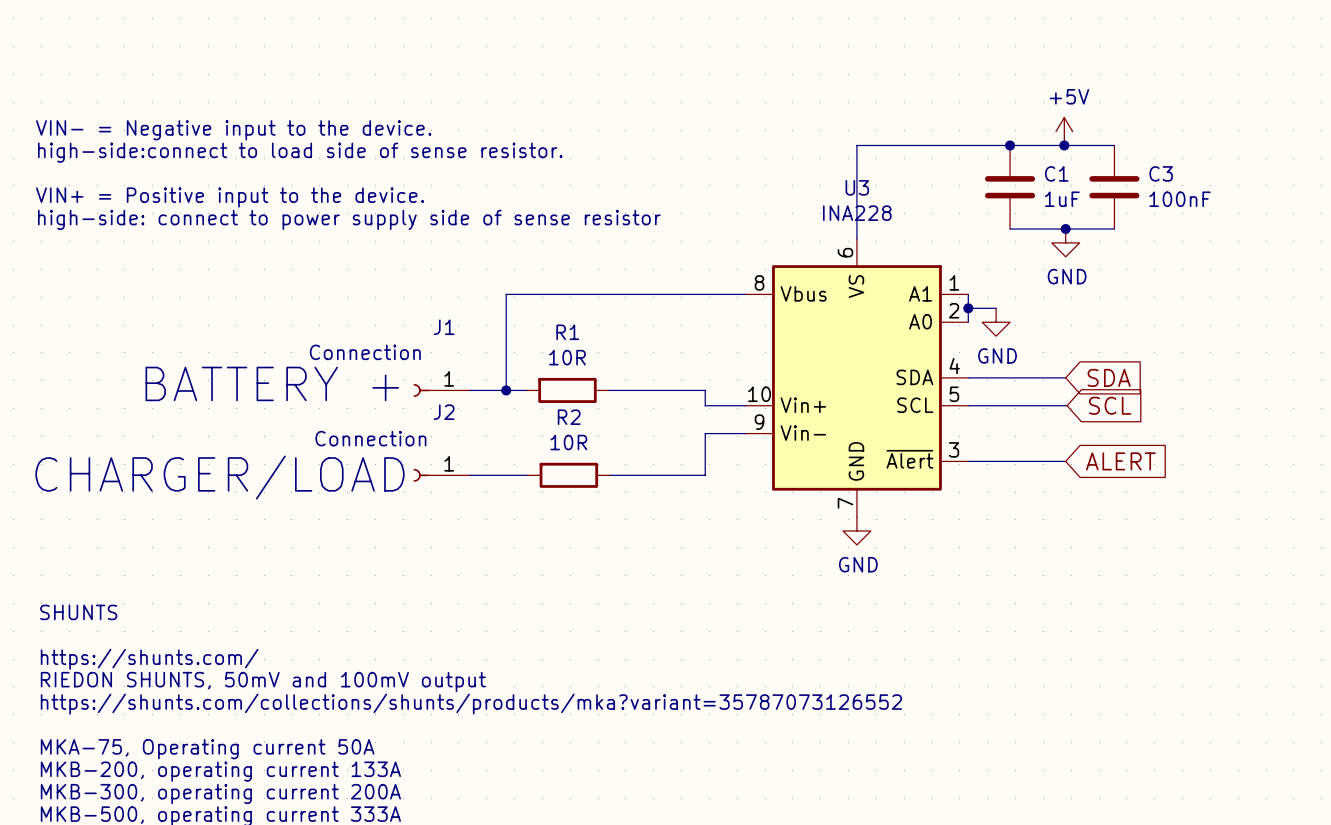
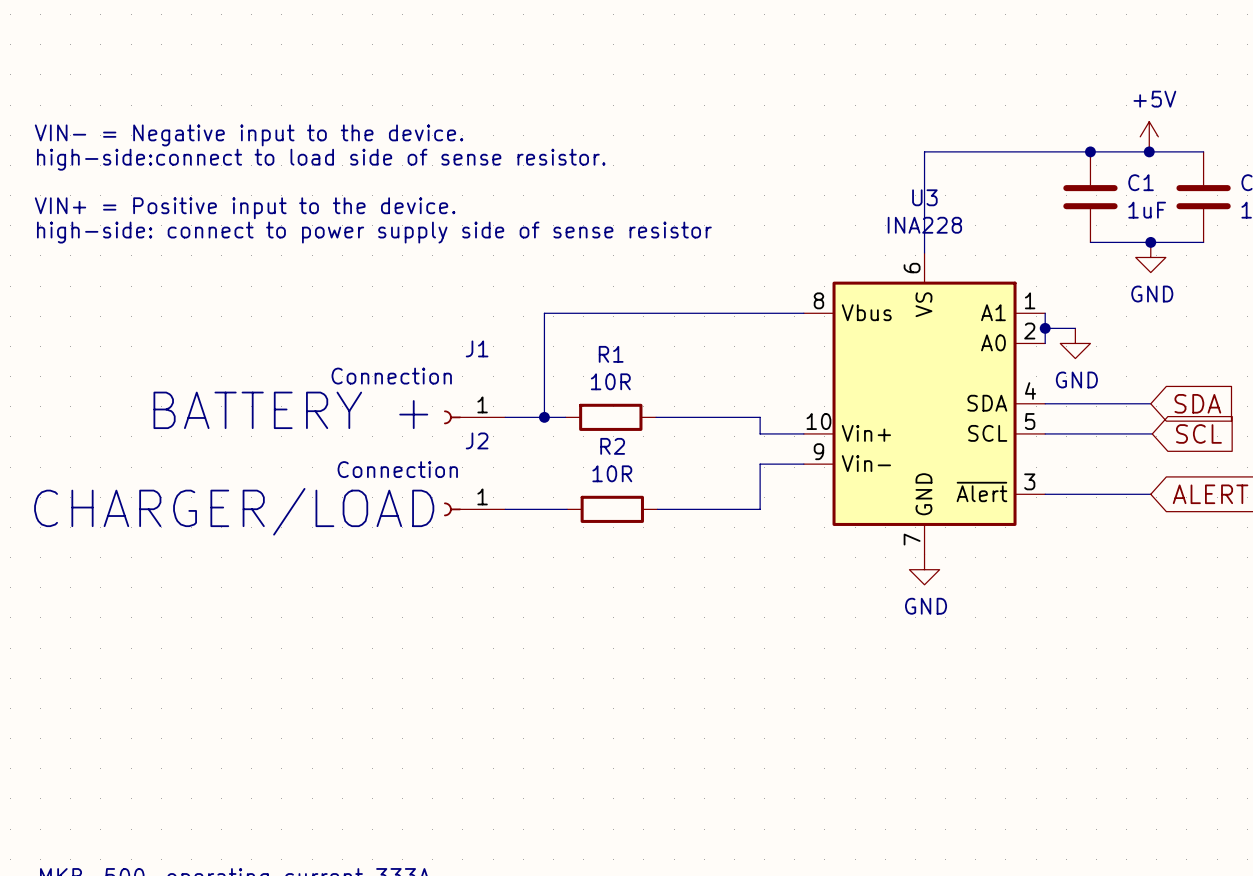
text: SHUNTS (78, 612) -> none
text: https://shunts.com/ (149, 659) -> none
text: RIEDON SHUNTS, 50mV and 100mV output (263, 681) -> none
text: https://shunts.com/collections/shunts/products/mka?variant=35787073126552 (471, 704) -> none
text: MKA-75, Operating current 50A (207, 749) -> none
text: MKB-200, operating current 133A (220, 771) -> none
text: MKB-300, operating current 200A (220, 794) -> none

